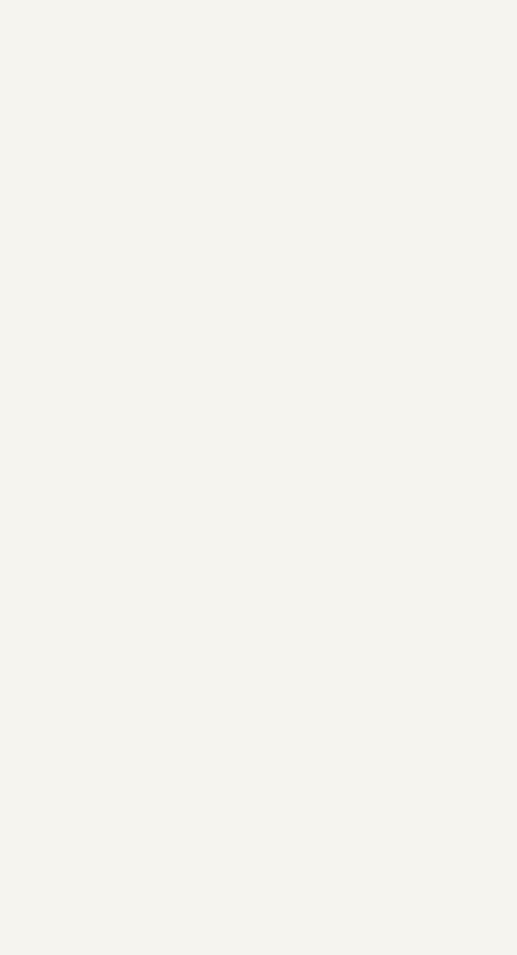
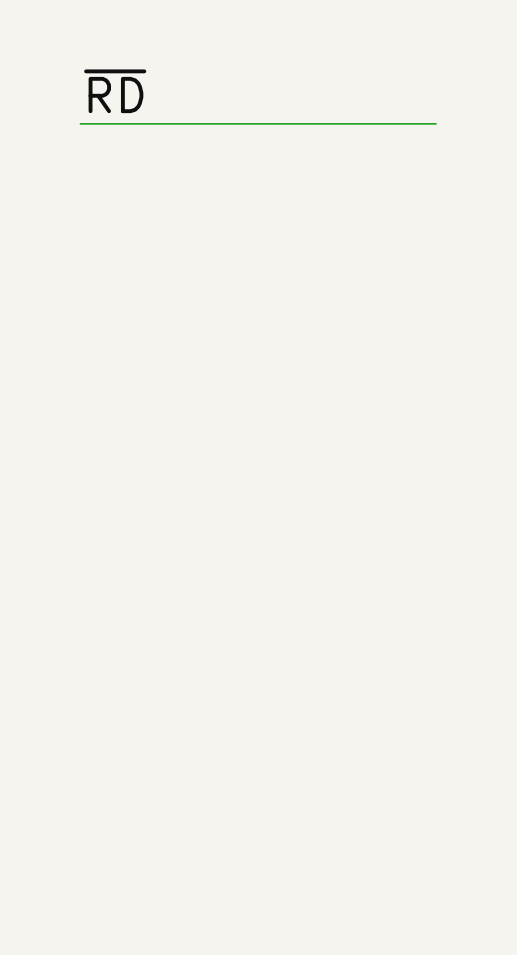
label: none -> ~{RD} (115, 91)
wire: none -> (80, 123) (436, 123)

